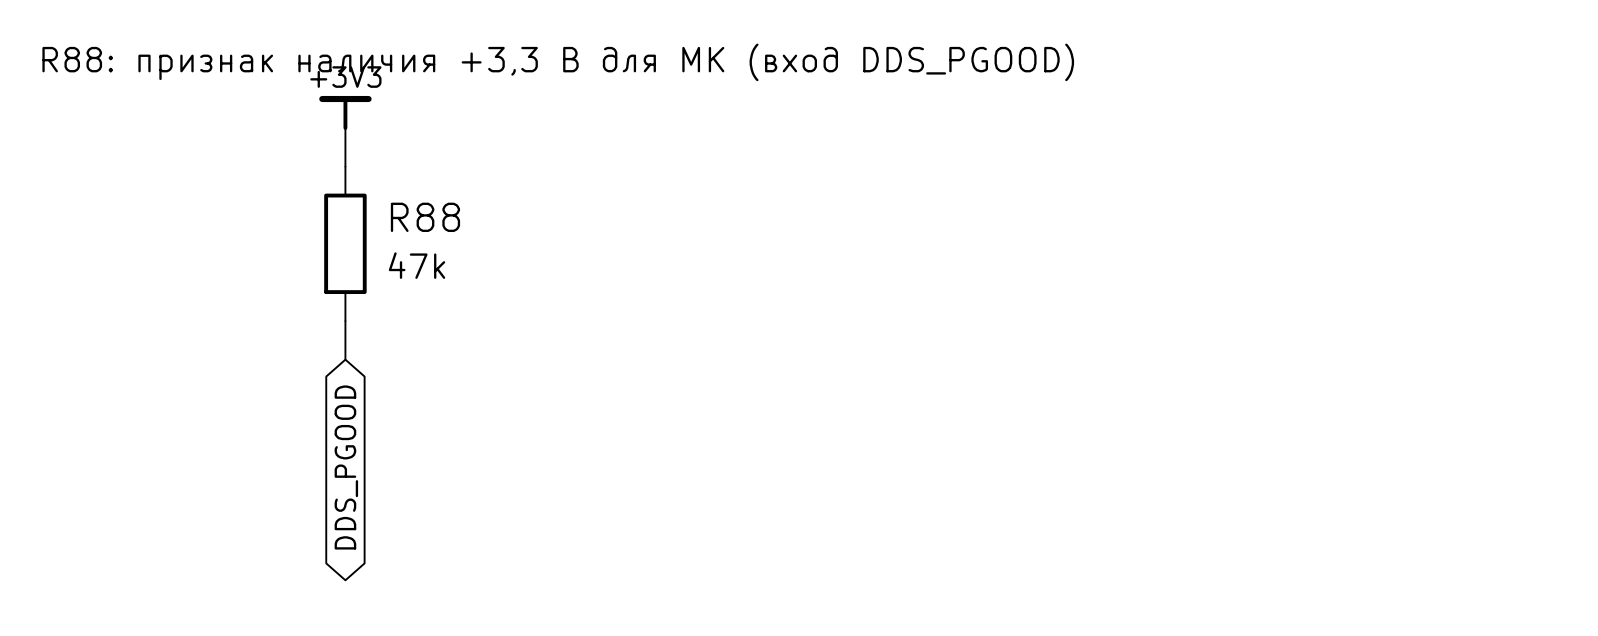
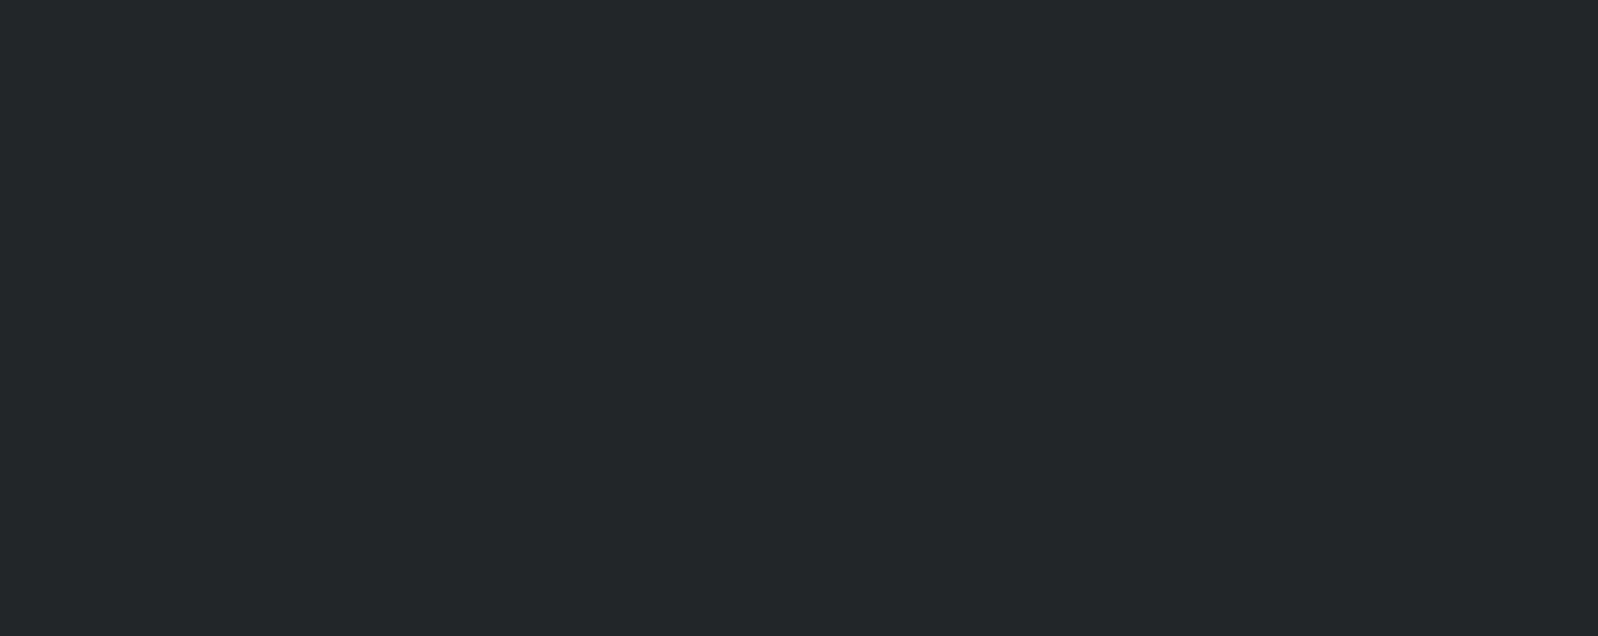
text: R88: признак наличия +3,3 В для МК (вход DDS_PGOOD) (558, 62) -> none
power symbol: +3V3 (345, 112) -> none
wire: (345, 127) (345, 166) -> none
R88: 47k (345, 243) -> none
wire: (345, 321) (345, 359) -> none
global label: DDS_PGOOD (346, 467) -> none

